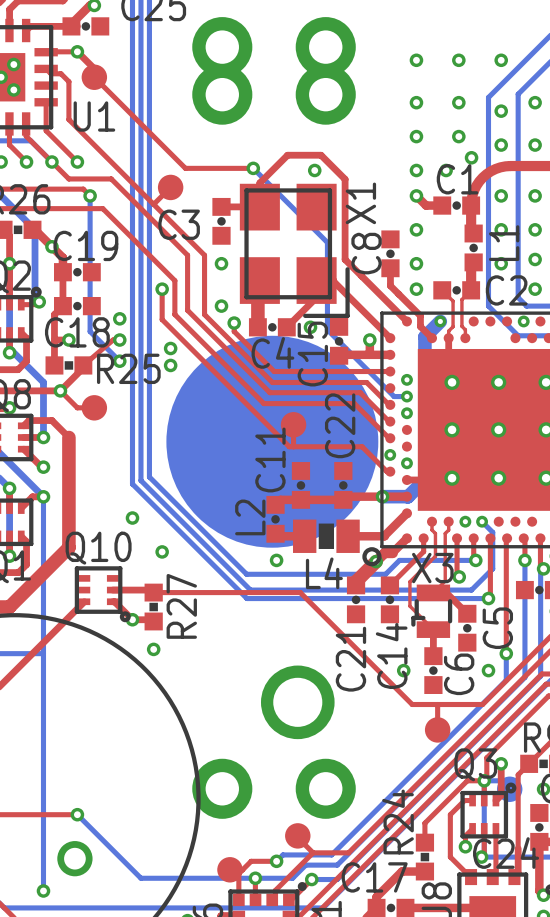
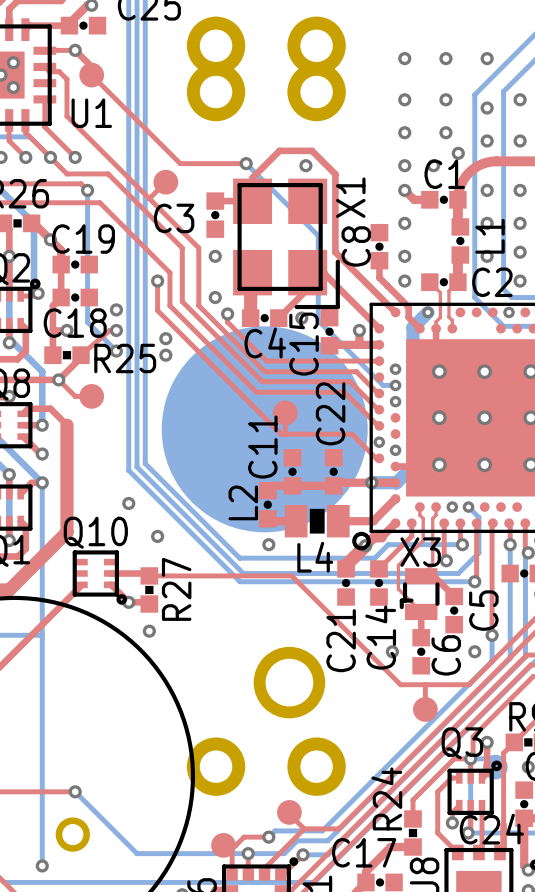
top track: (405, 907) (492, 907) -> none

